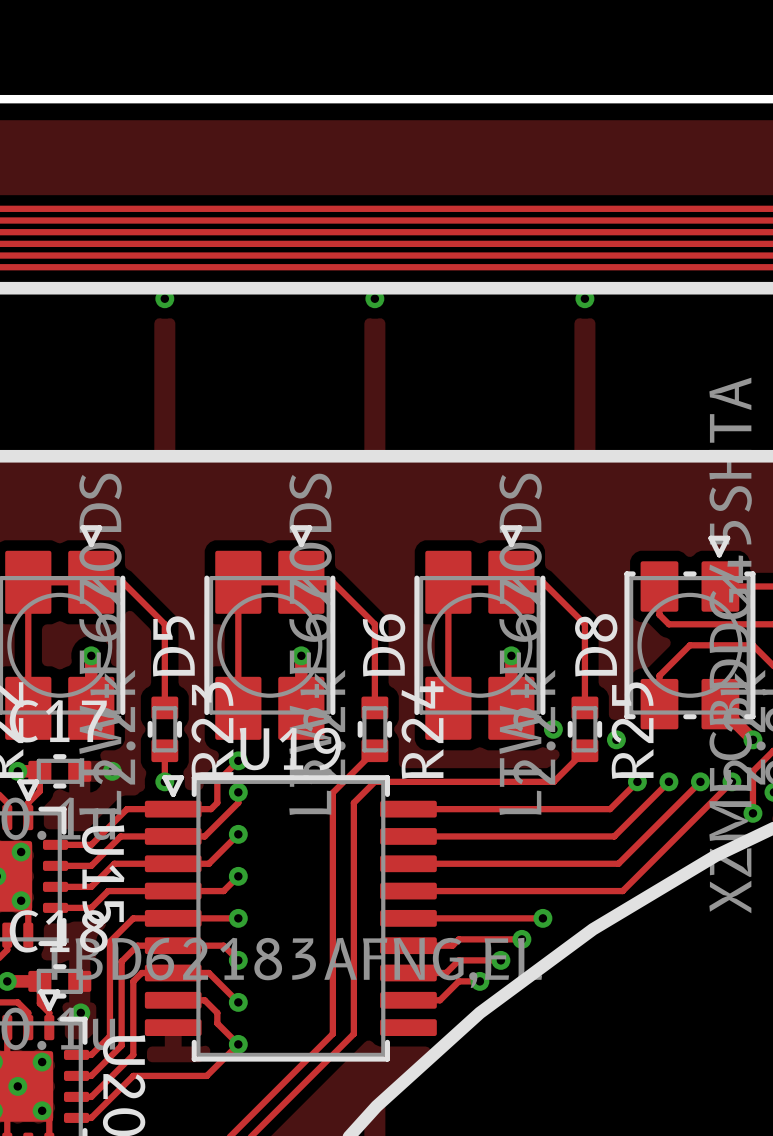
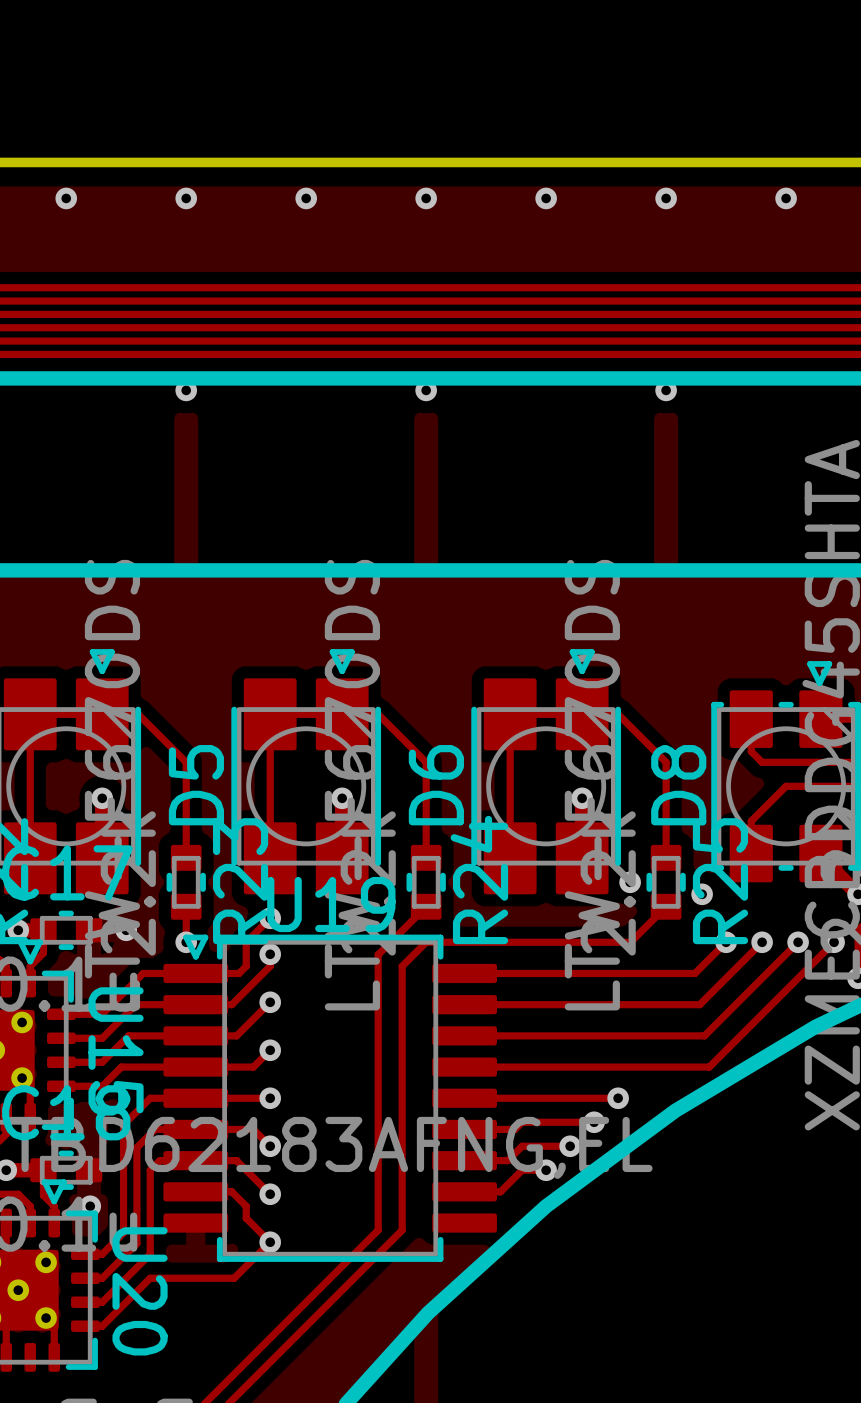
via: none -> (66, 198)
via: none -> (186, 198)
via: none -> (306, 198)
via: none -> (426, 198)
via: none -> (546, 198)
via: none -> (666, 198)
via: none -> (786, 198)

